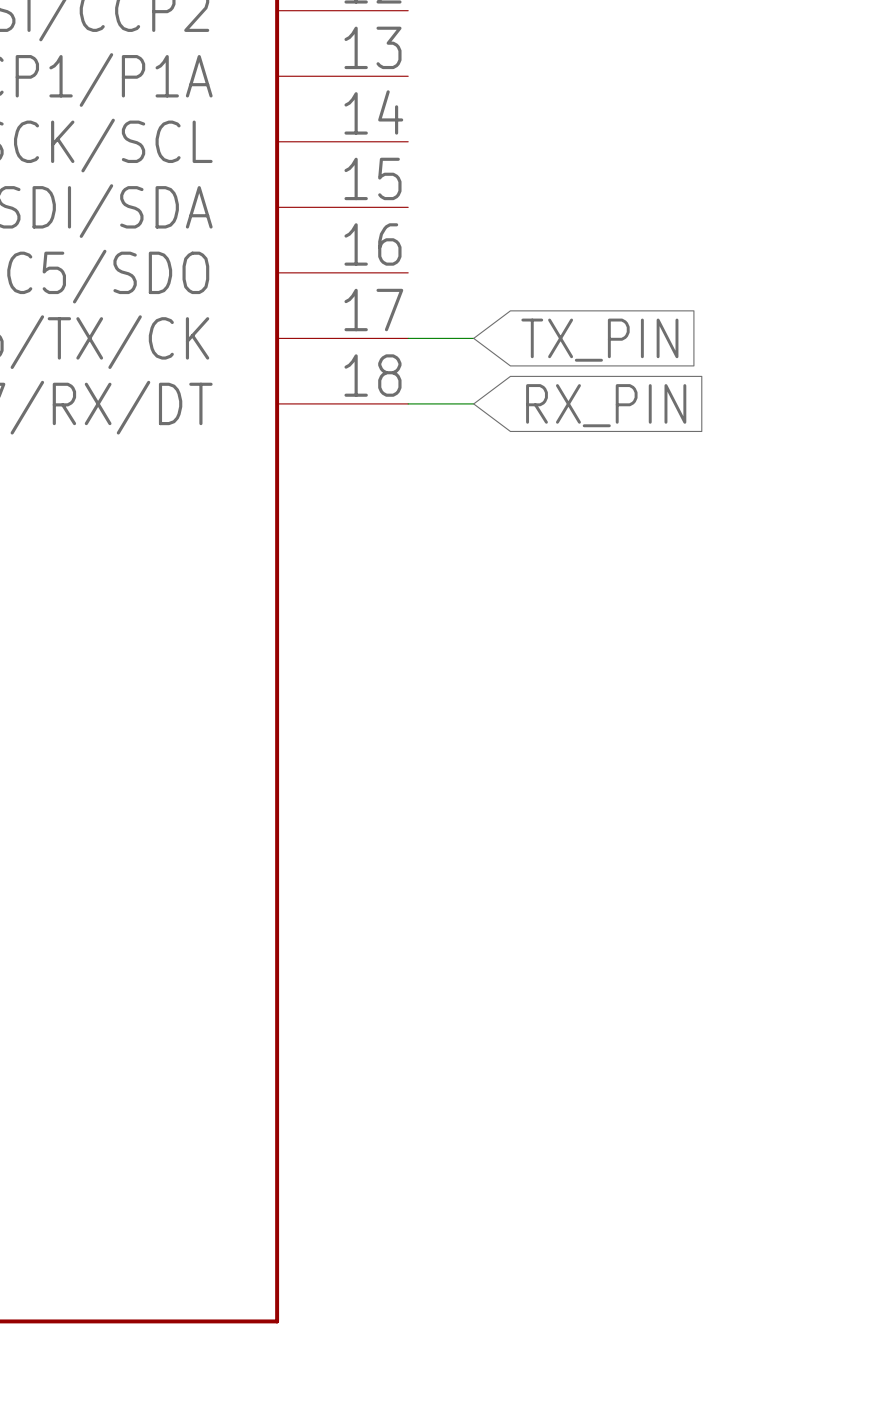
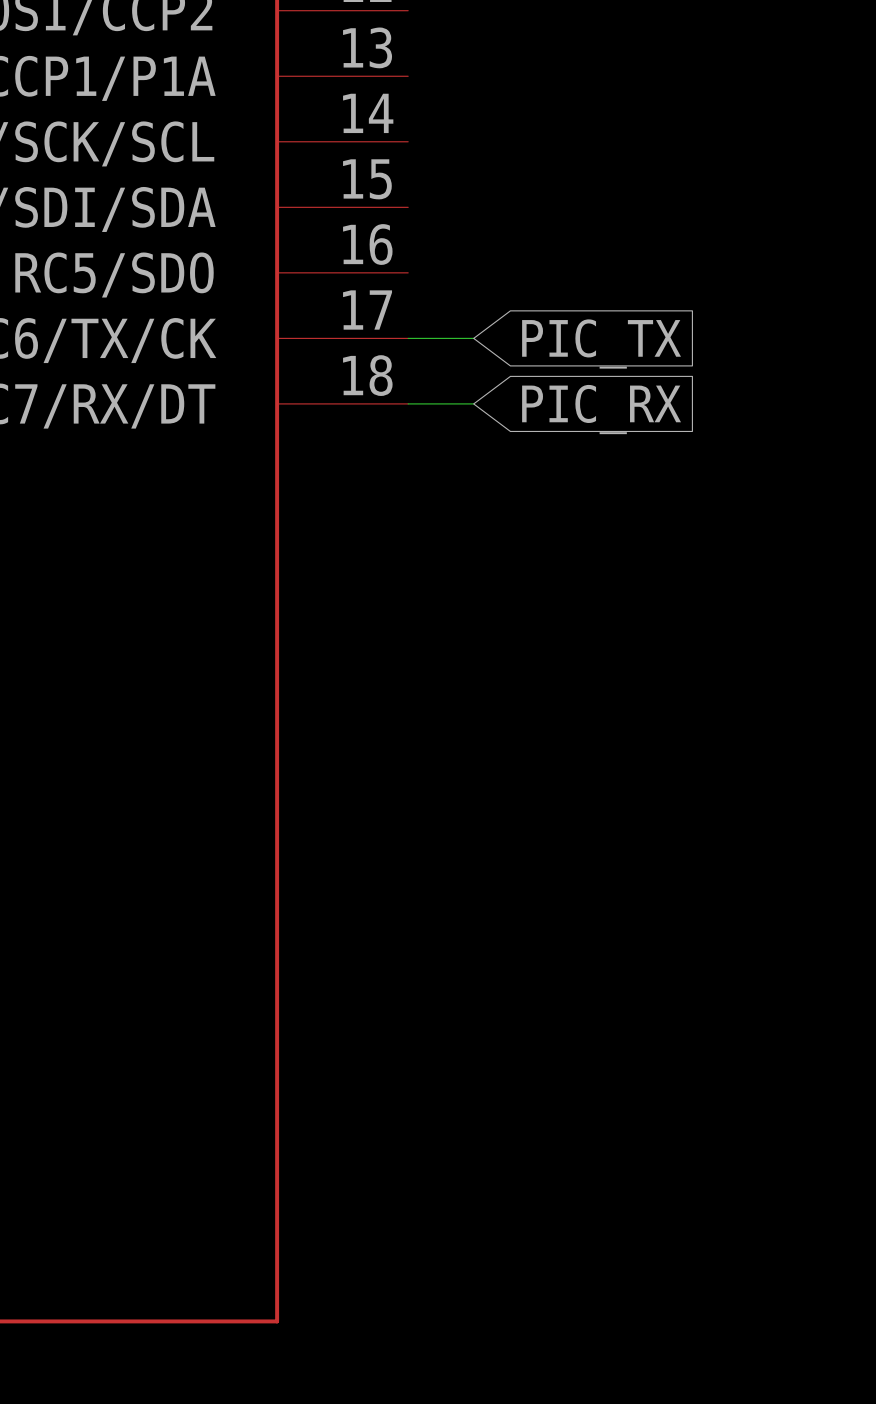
global label: TX_PIN (599, 340) -> PIC_TX (601, 343)
global label: RX_PIN (606, 405) -> PIC_RX (601, 409)

